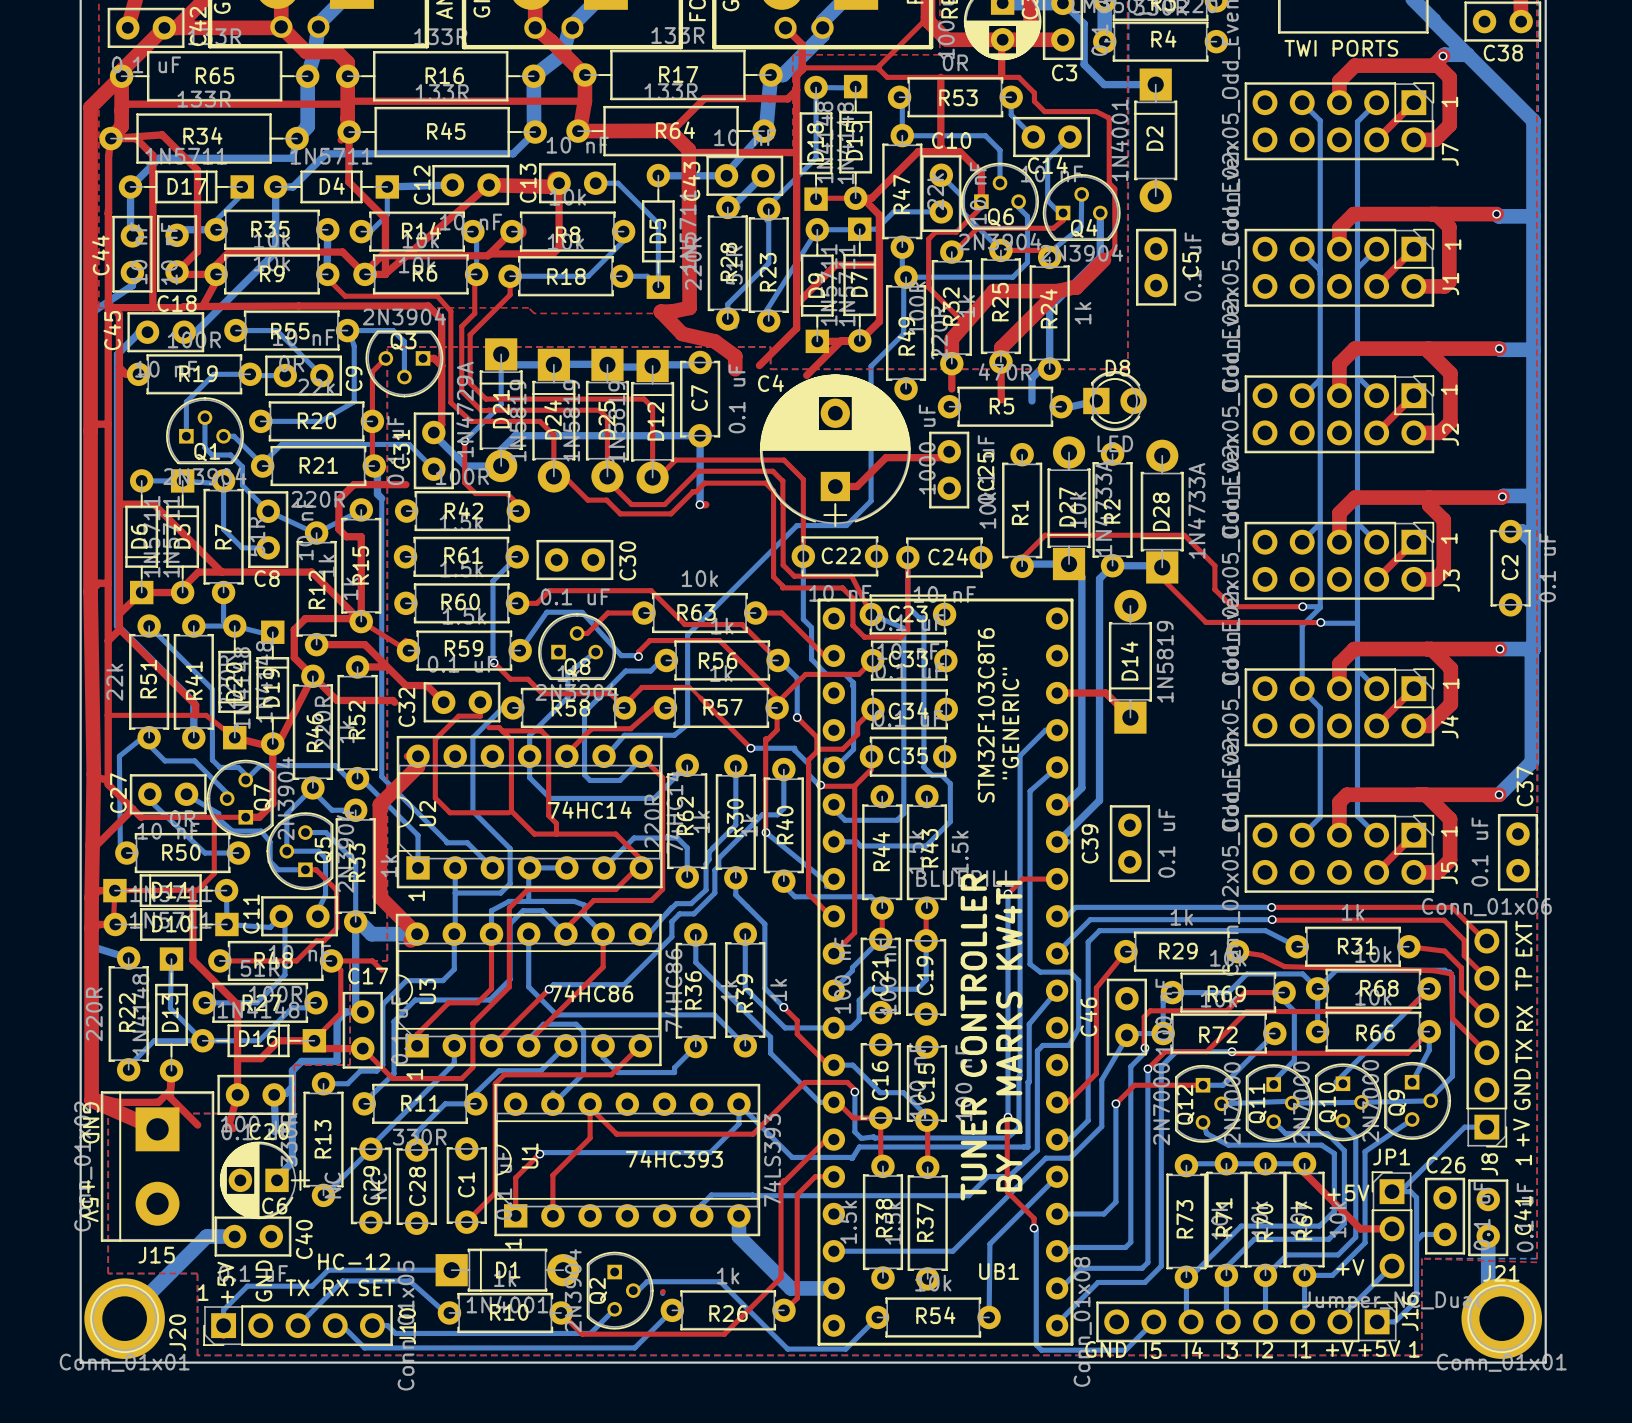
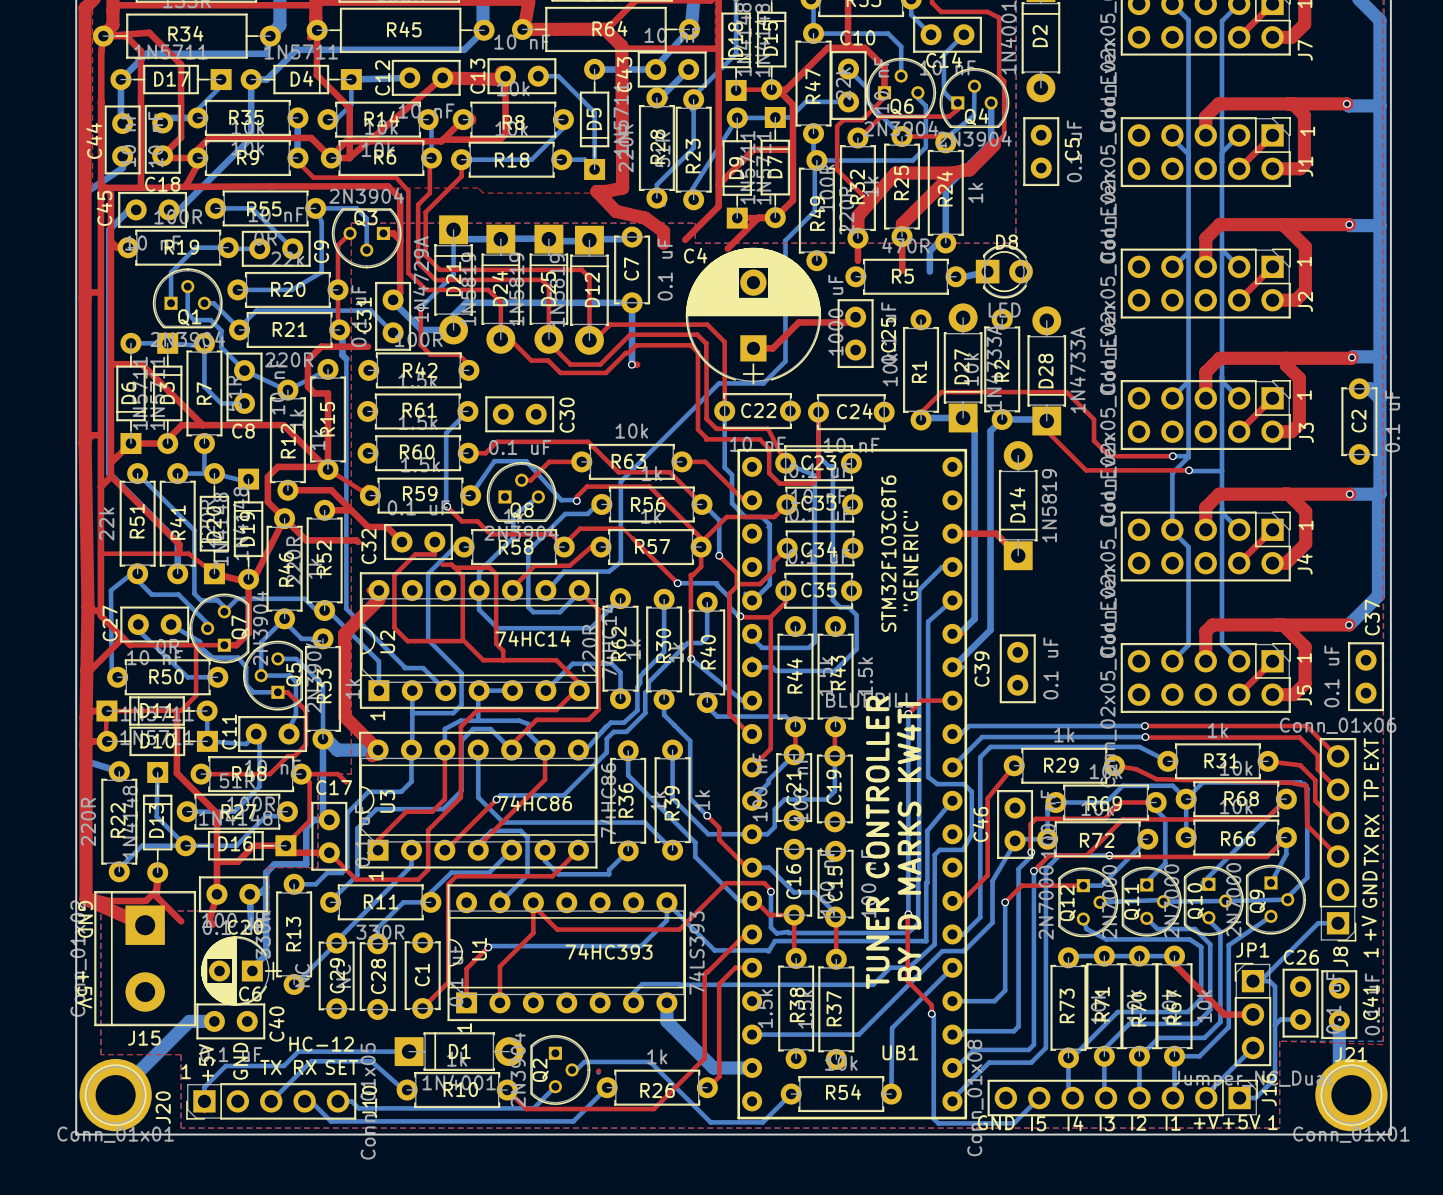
text: +5V (1348, 1192) -> none
text: +V (1350, 1267) -> none

